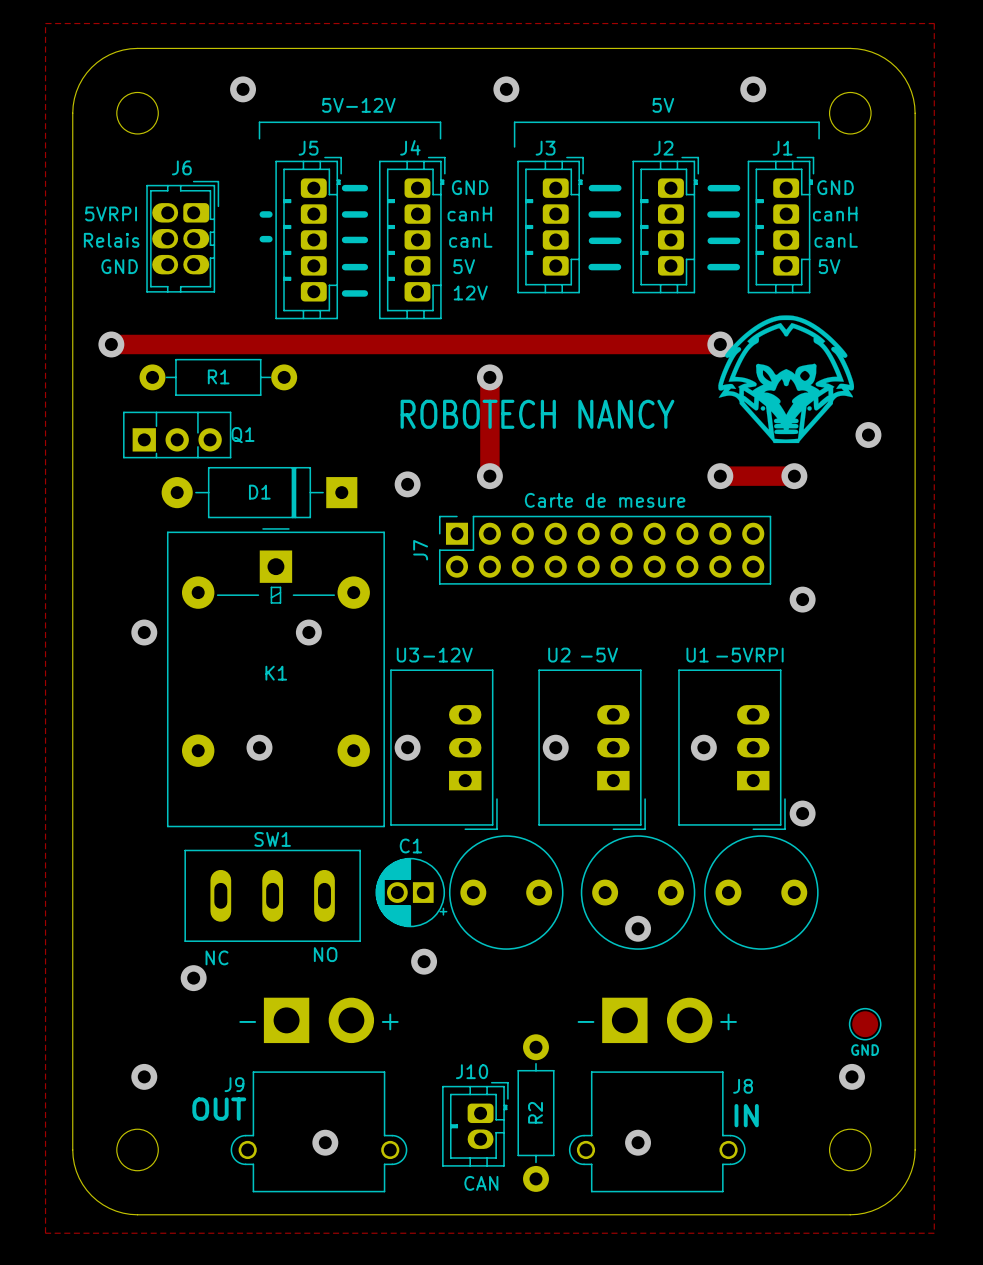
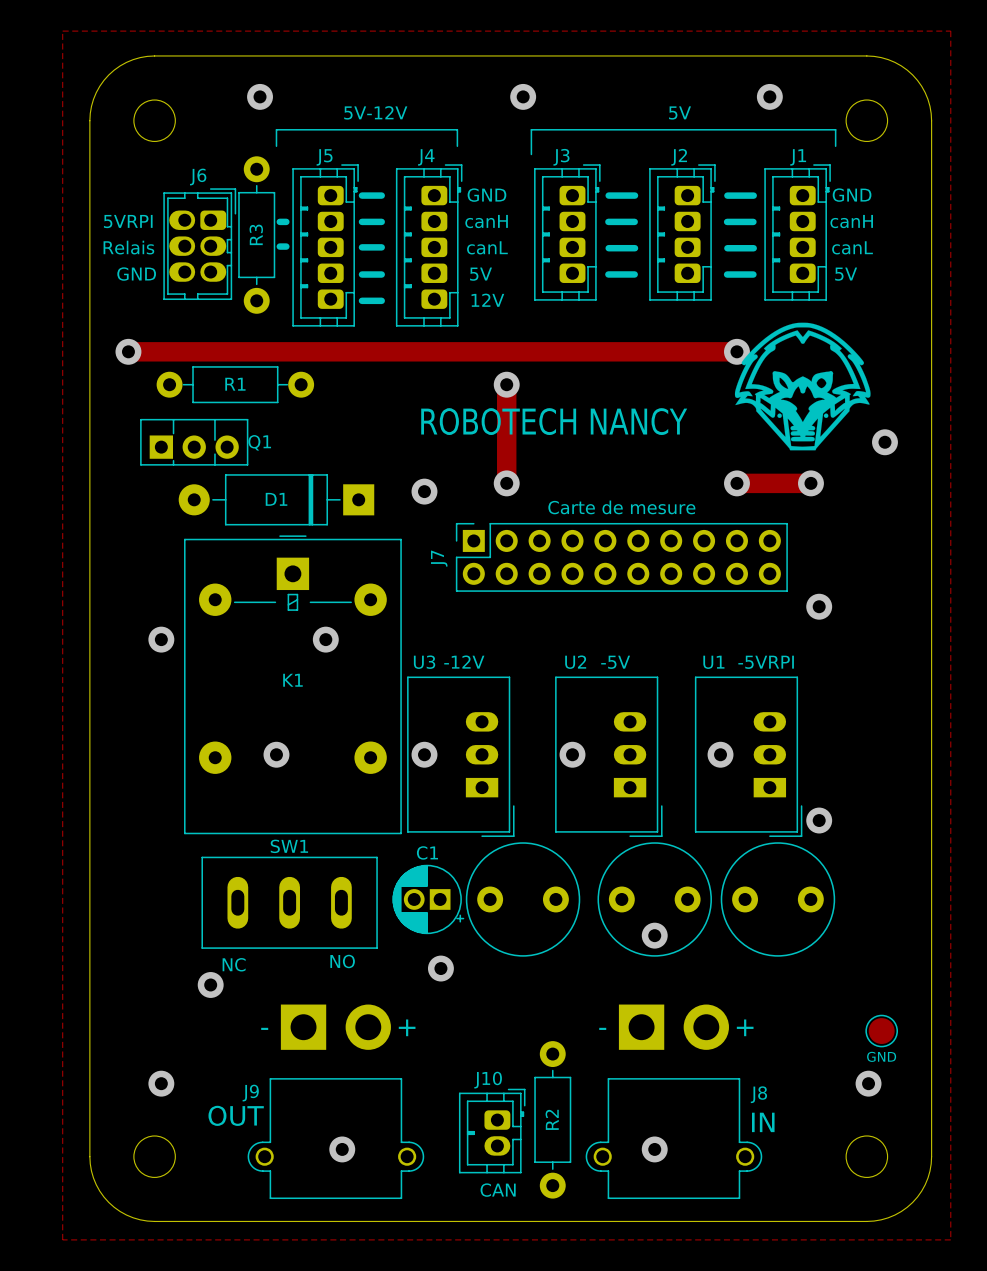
R3: none -> (256, 235)

